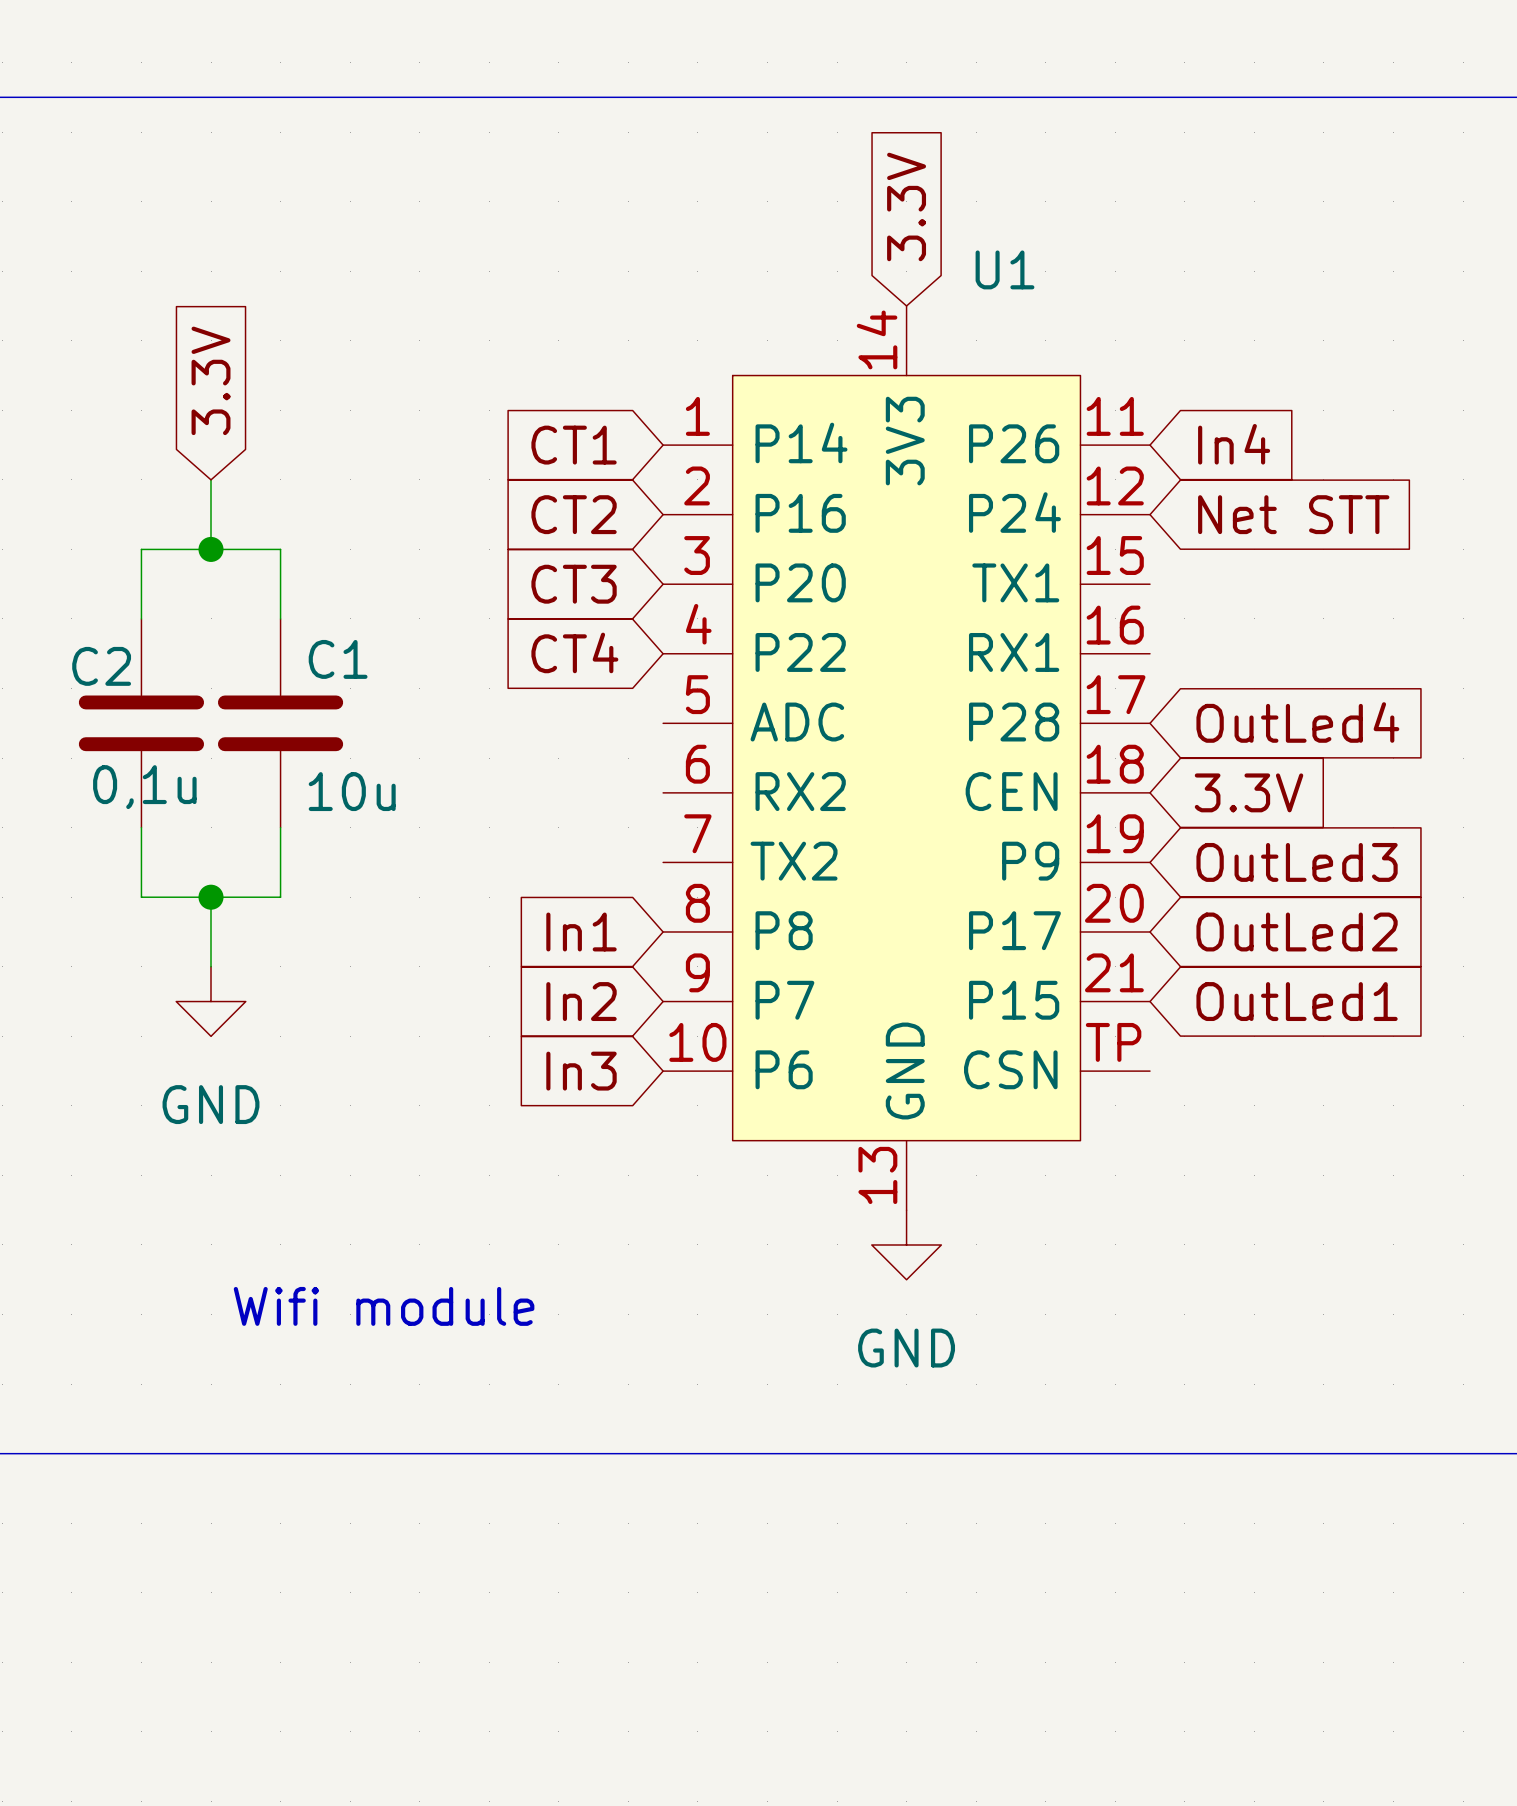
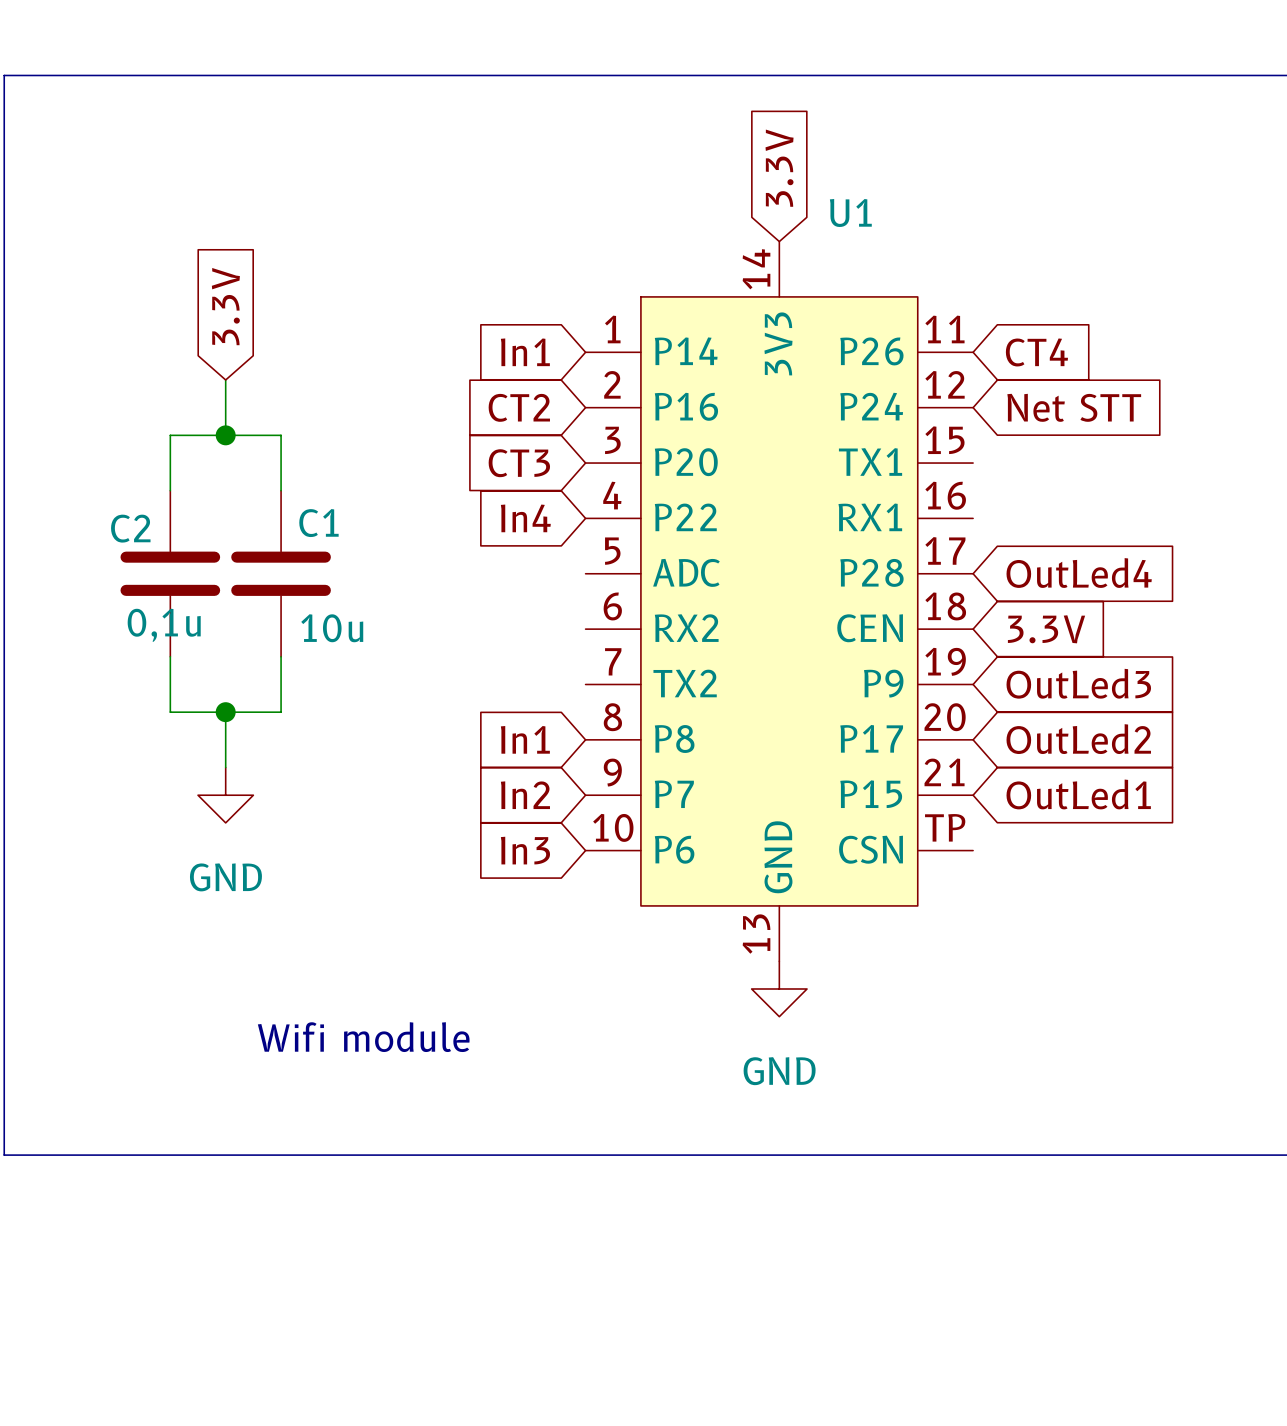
global label: In4 (1234, 444) -> CT4 (1036, 352)
global label: CT1 (574, 445) -> In1 (525, 352)
global label: CT4 (574, 652) -> In4 (525, 518)

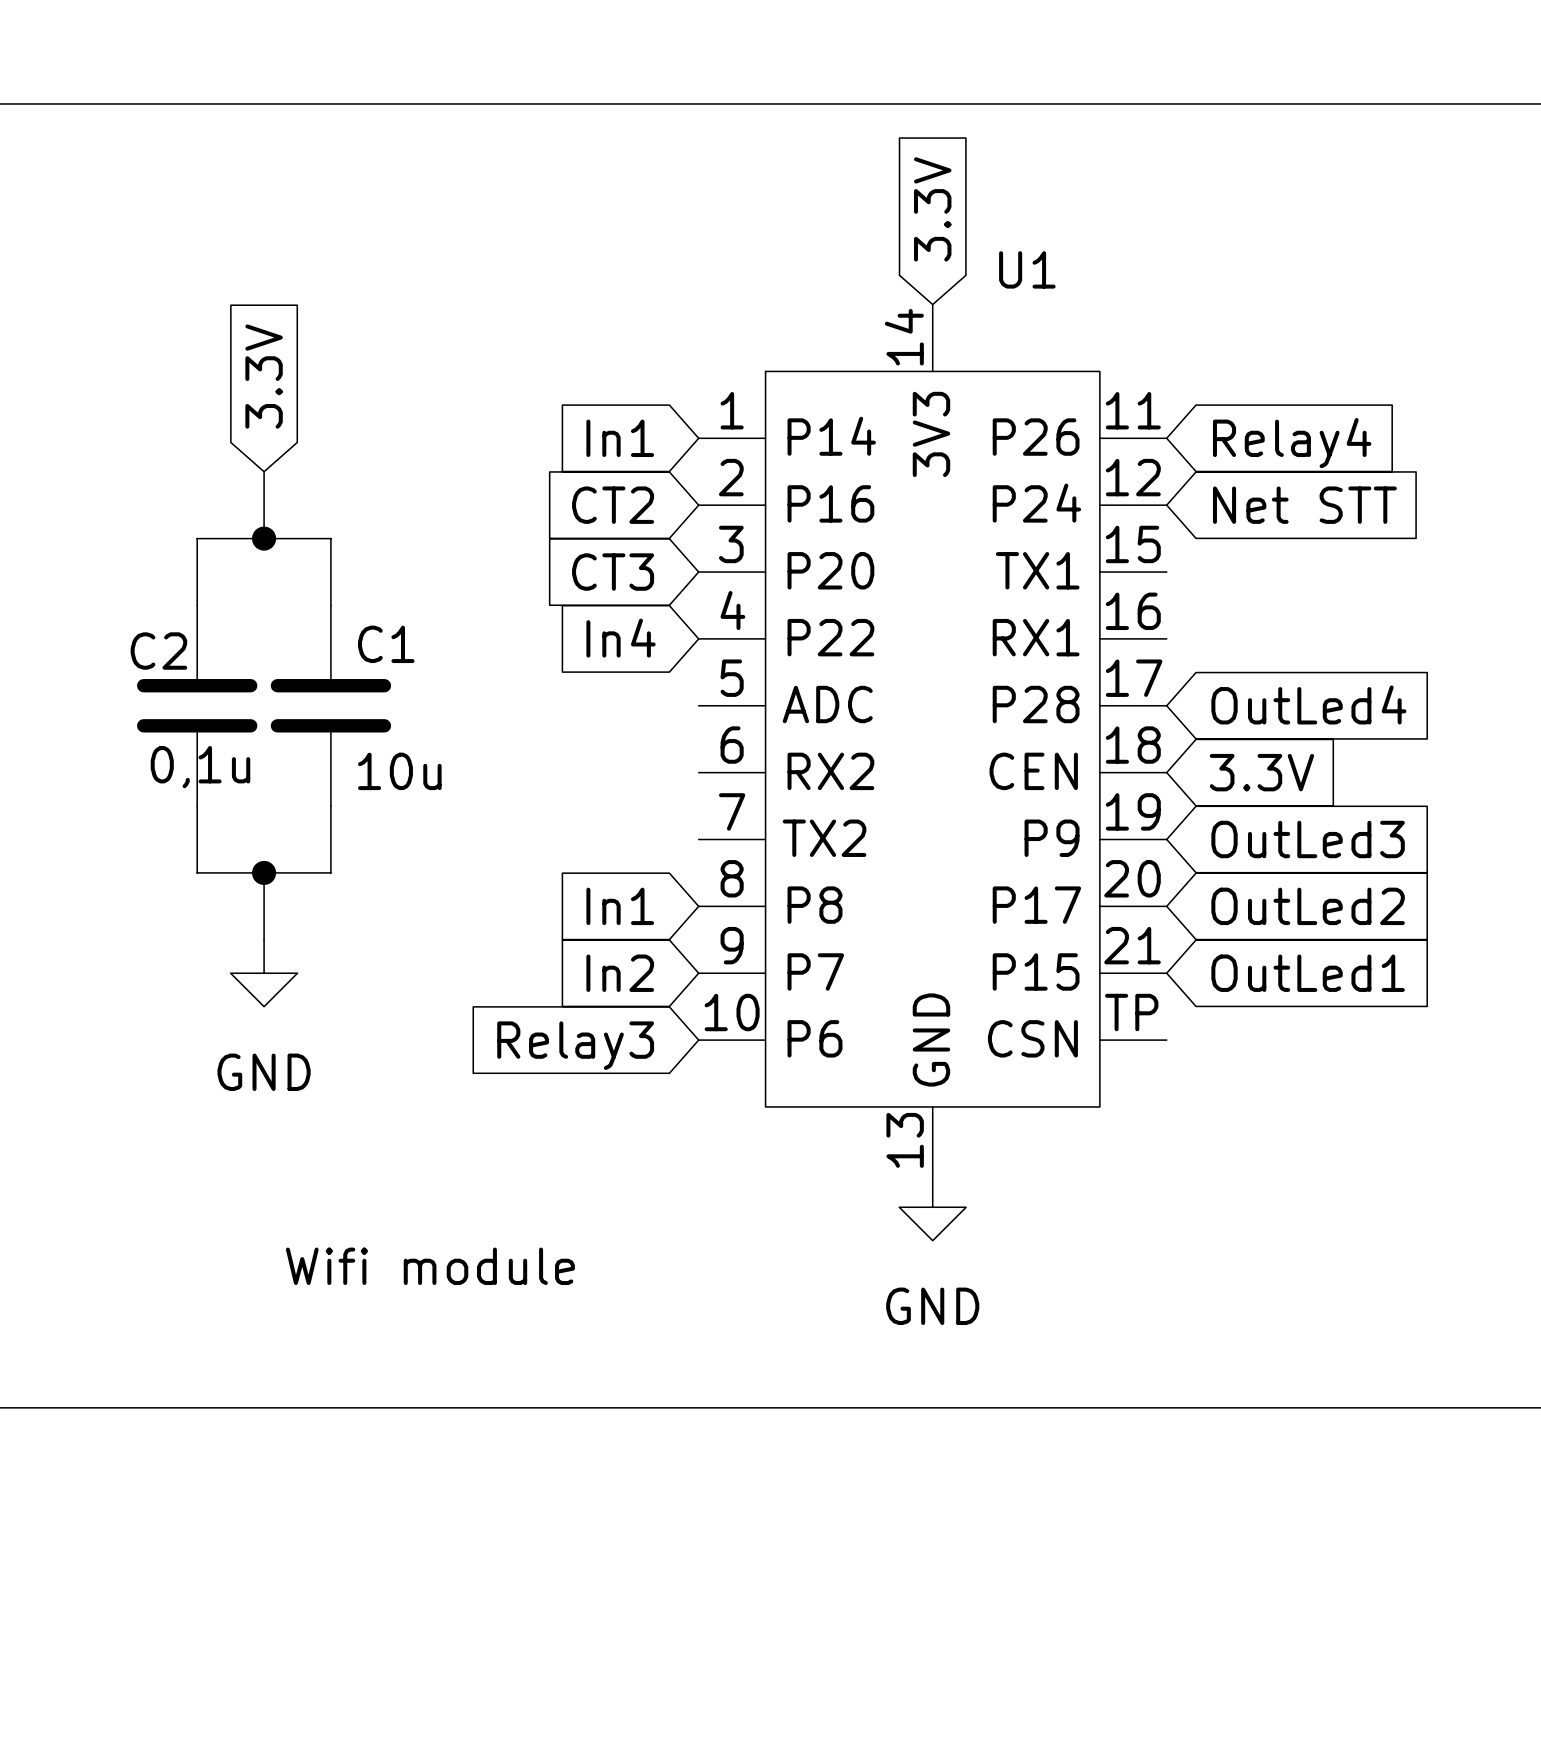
global label: CT4 (1036, 352) -> Relay4 (1292, 443)
global label: In3 (525, 850) -> Relay3 (575, 1045)

